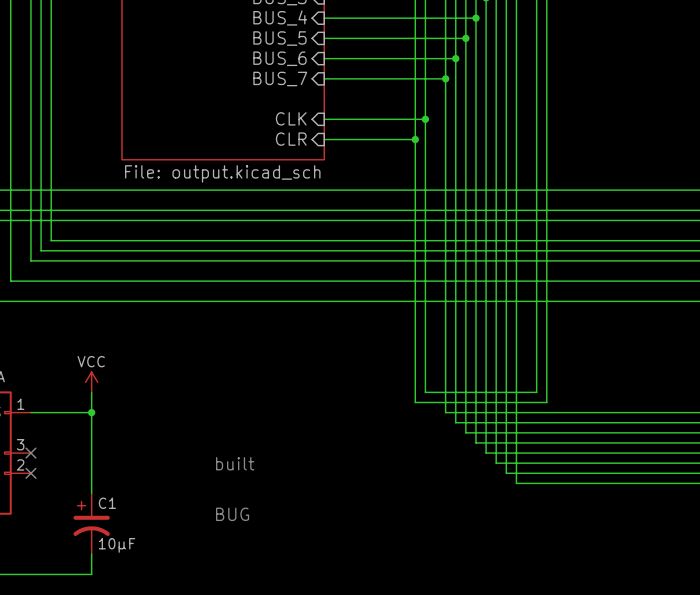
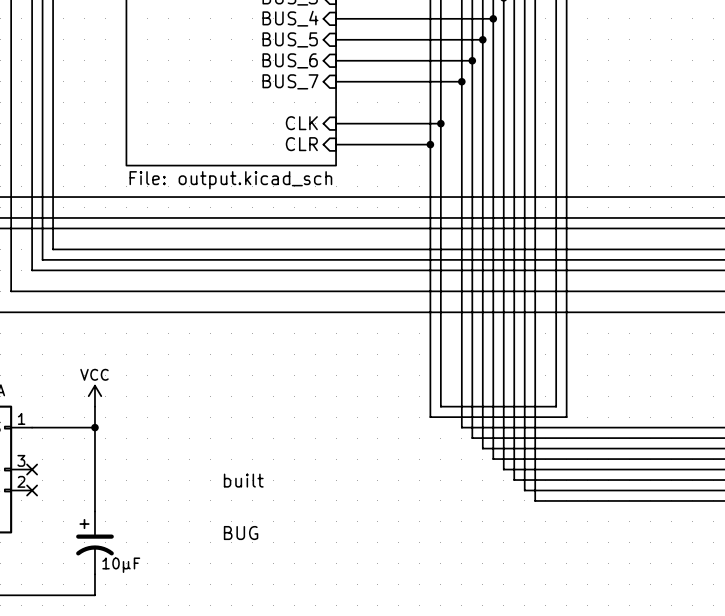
C1 name: C1 (107, 503) -> none

